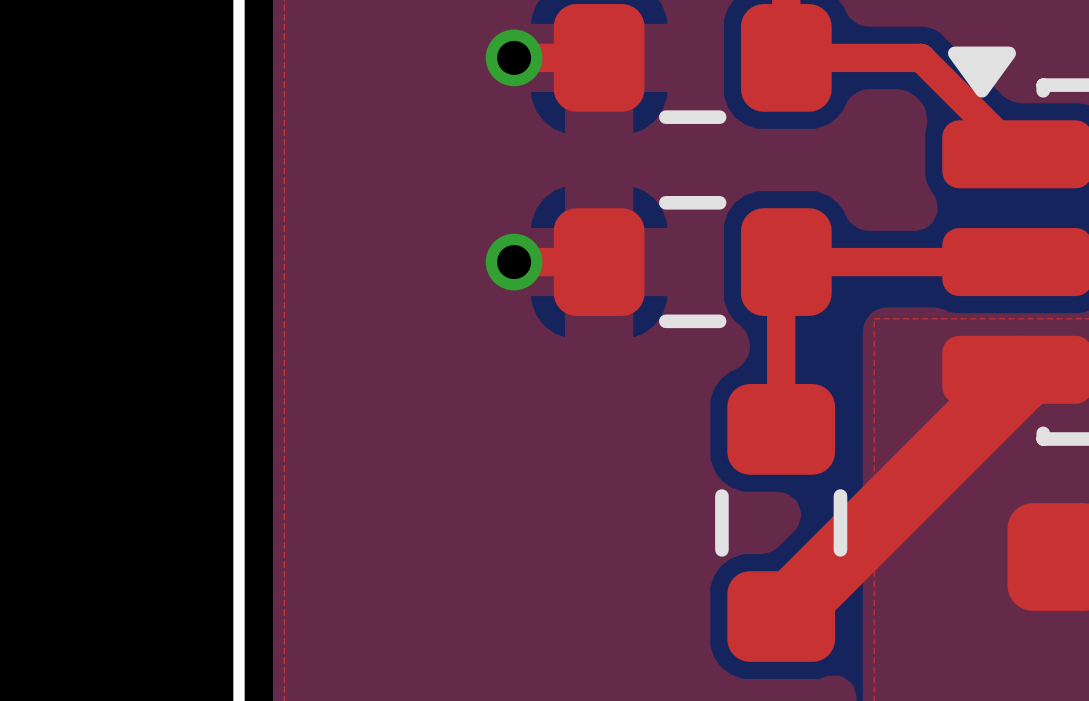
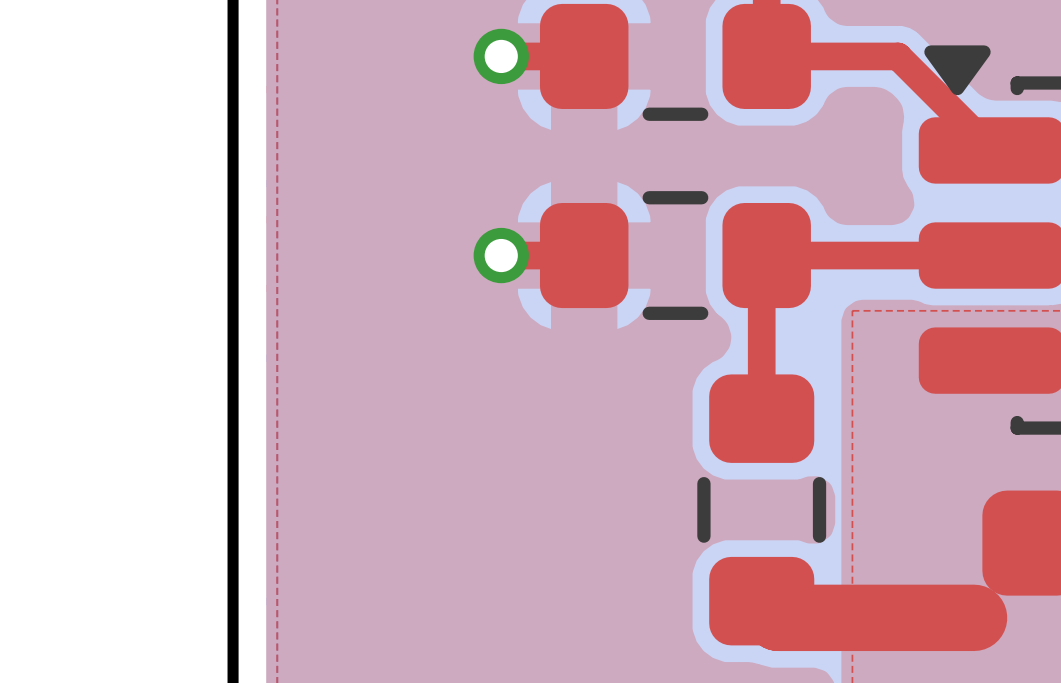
top track: (1017, 369) (1017, 380) (781, 616) -> (974, 617) (778, 617) (761, 601)

